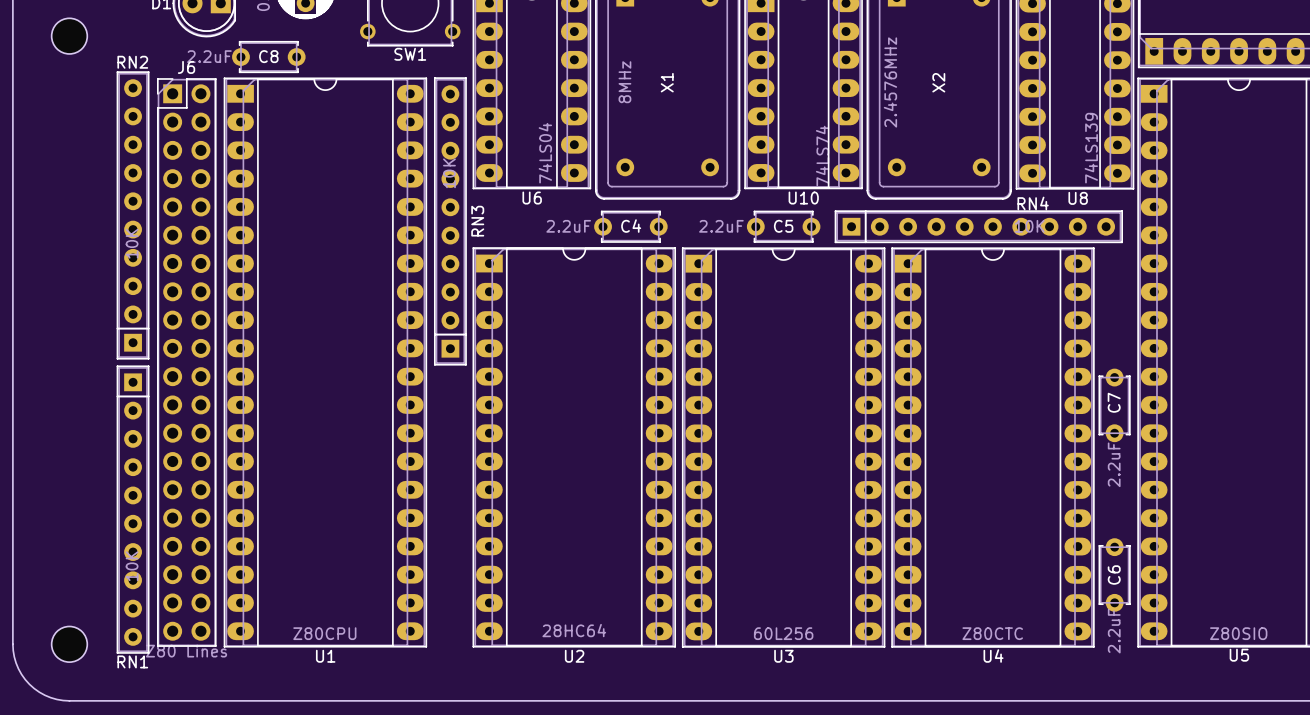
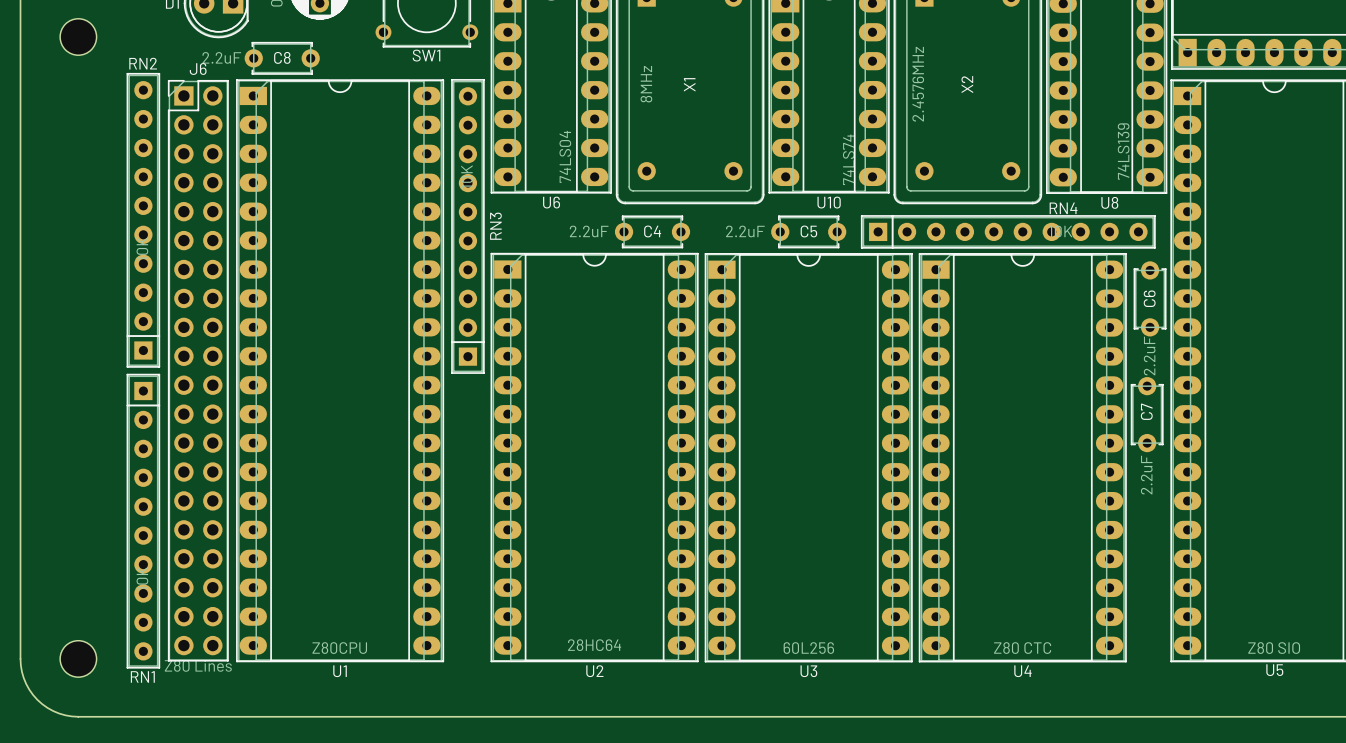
C6 position: (1114, 575) -> (1150, 298)
U4 value: Z80CTC (992, 633) -> Z80 CTC (1022, 648)
U5 value: Z80SIO (1238, 633) -> Z80 SIO (1274, 648)

